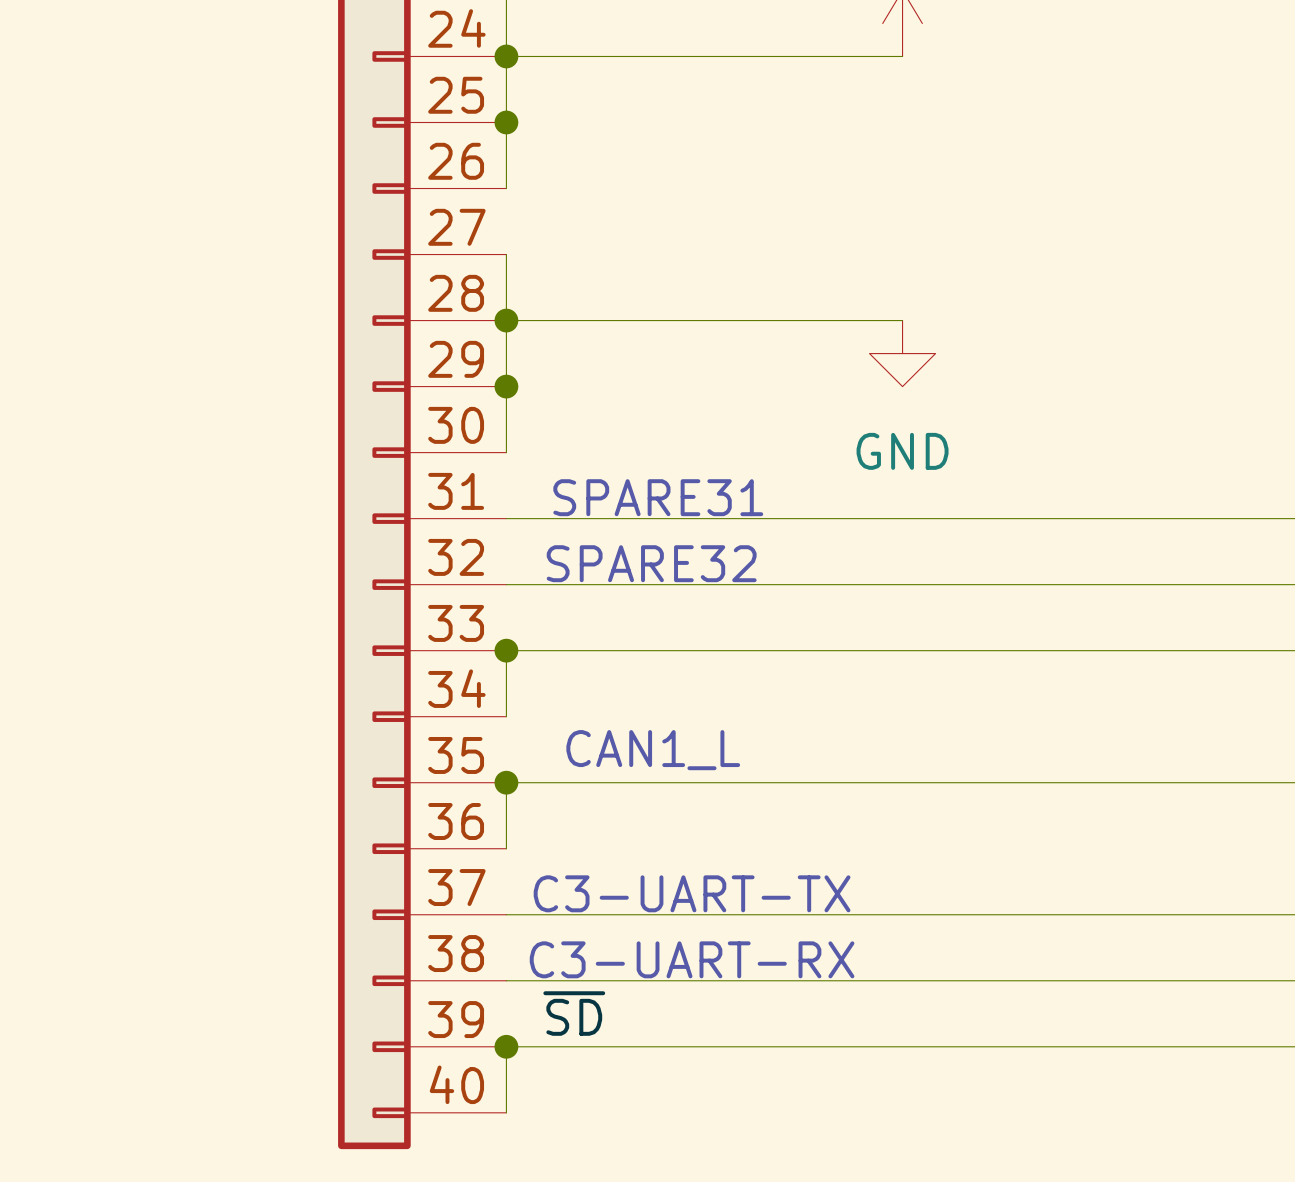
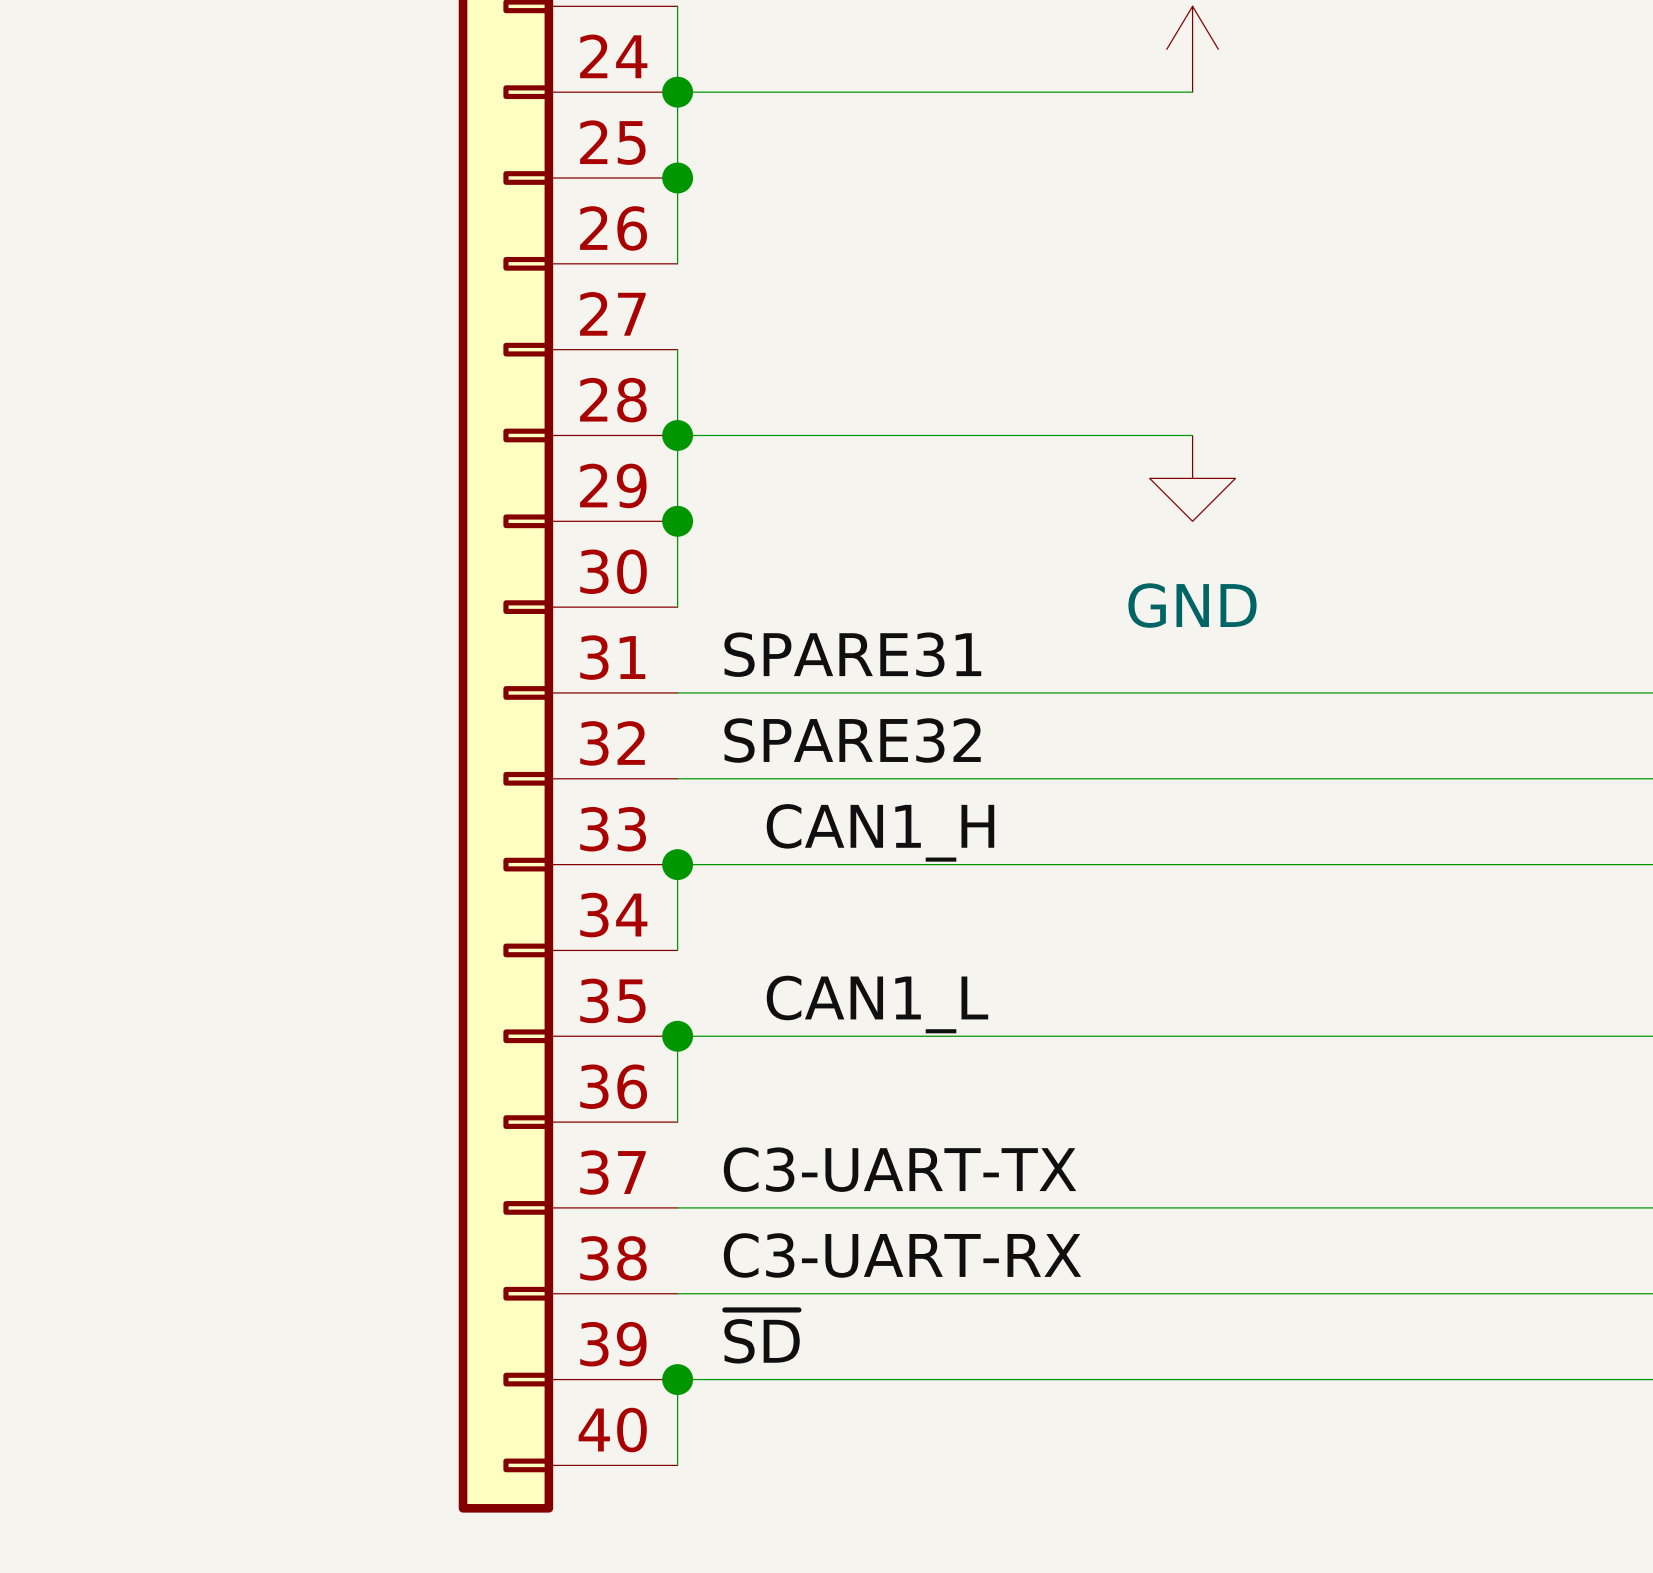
label: none -> SPARE31 (852, 654)
text: SPARE31 (658, 497) -> none
label: none -> SPARE32 (852, 740)
text: SPARE32 (651, 563) -> none
label: none -> CAN1_H (880, 832)
text: CAN1_L (653, 750) -> none
label: none -> CAN1_L (877, 1004)
label: none -> C3-UART-TX (900, 1169)
text: C3-UART-TX (692, 893) -> none
label: none -> C3-UART-RX (902, 1255)
text: C3-UART-RX (692, 959) -> none

